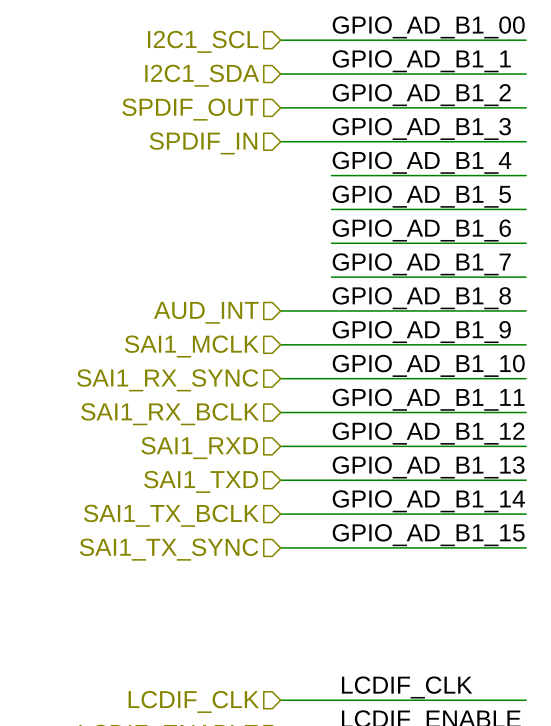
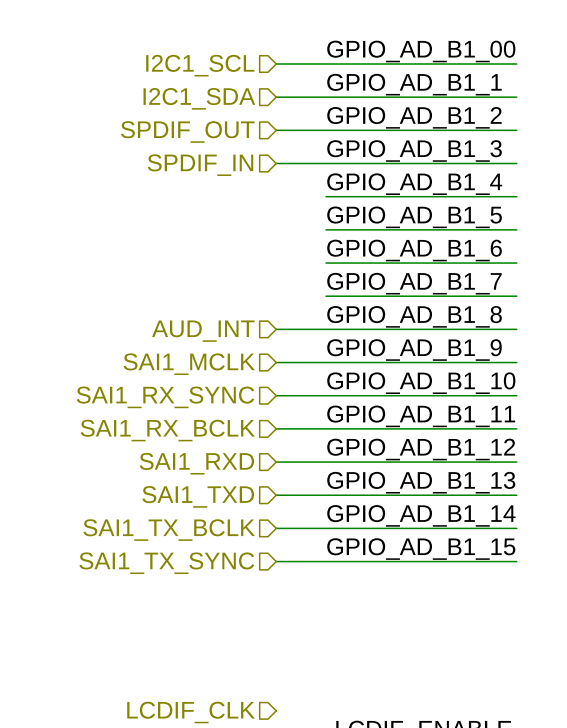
label: LCDIF_CLK (407, 687) -> none
wire: (280, 700) (526, 700) -> none

